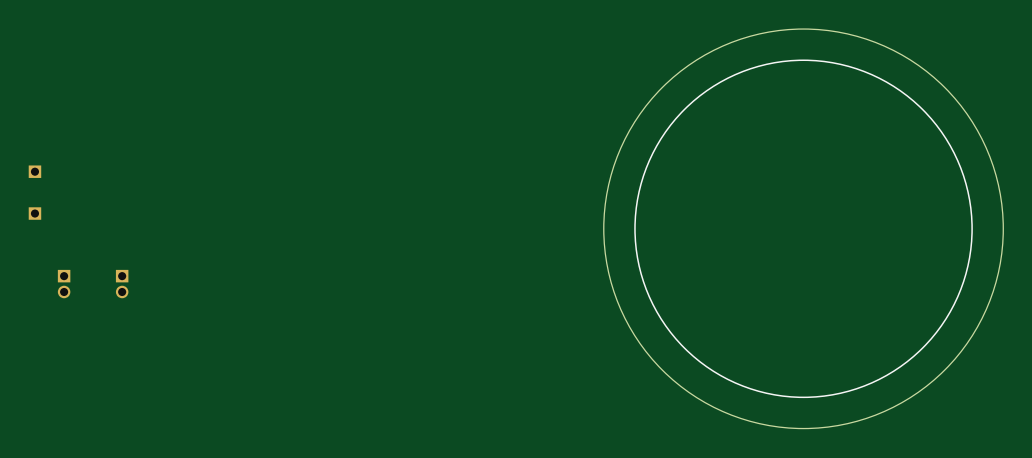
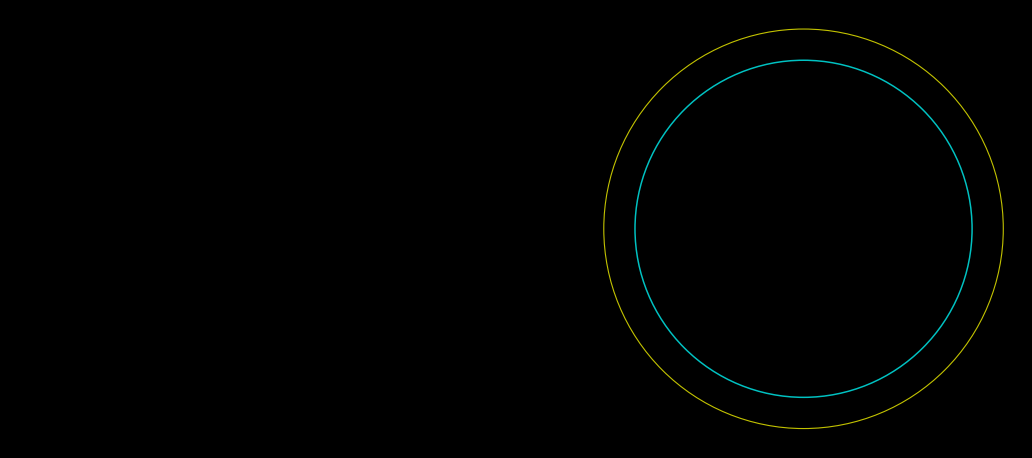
part: (34, 171) -> none
part: (34, 213) -> none
part: (64, 284) -> none
part: (122, 284) -> none

